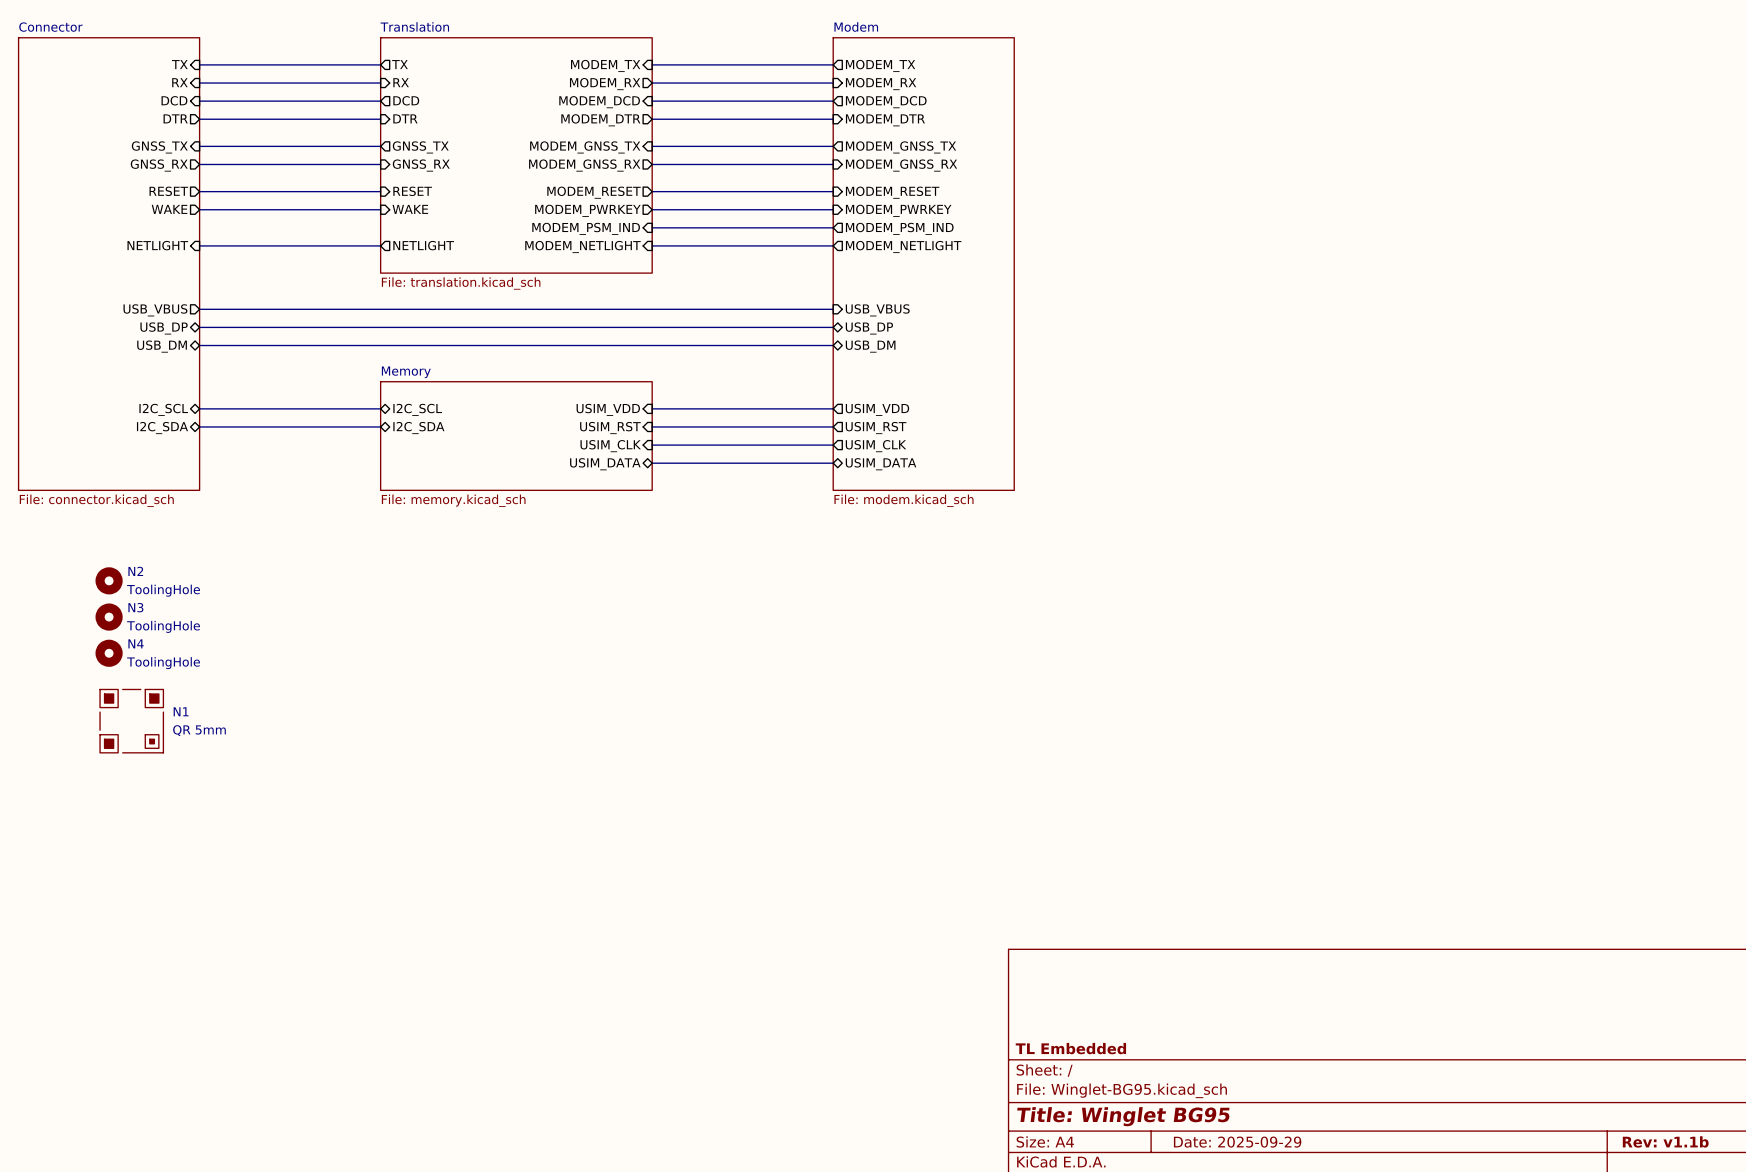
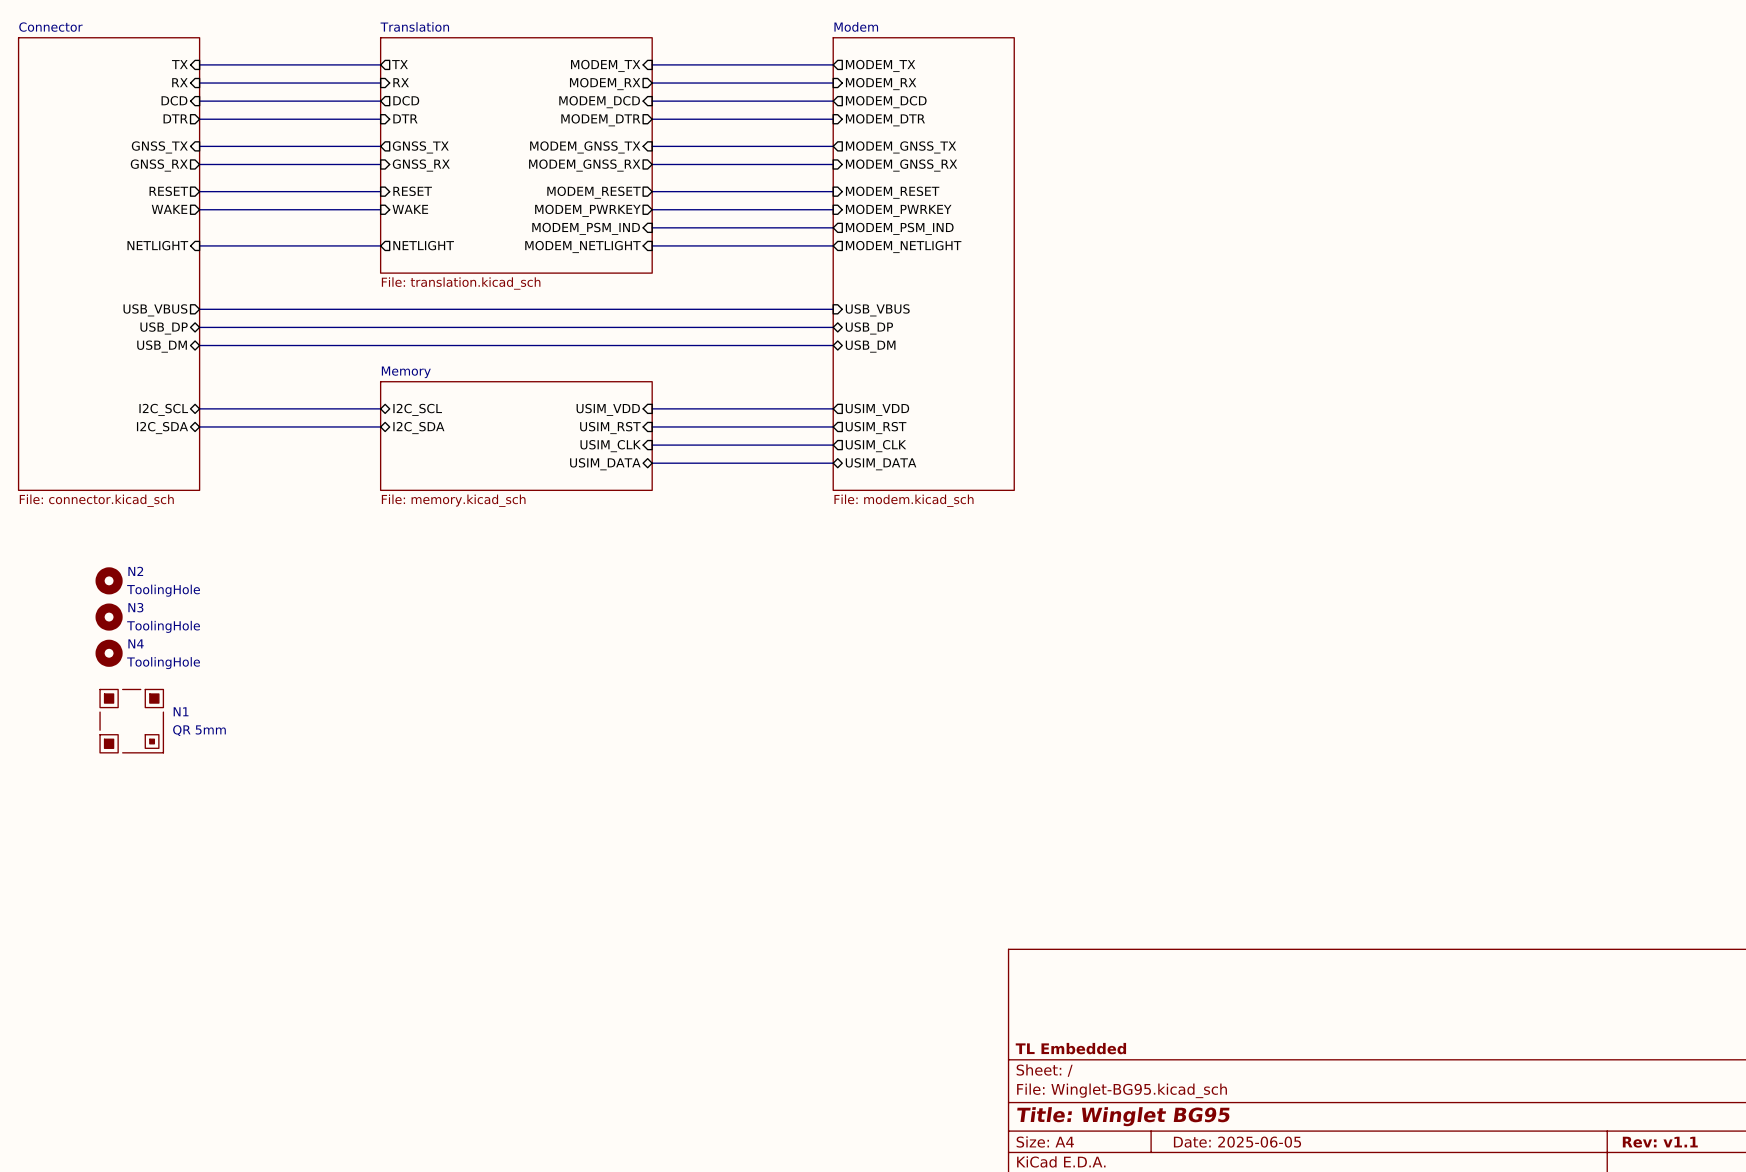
title block: Rev: v1.1b (1665, 1141) -> Rev: v1.1 (1660, 1142)
title block: Date: 2025-09-29 (1237, 1142) -> Date: 2025-06-05 (1237, 1142)

